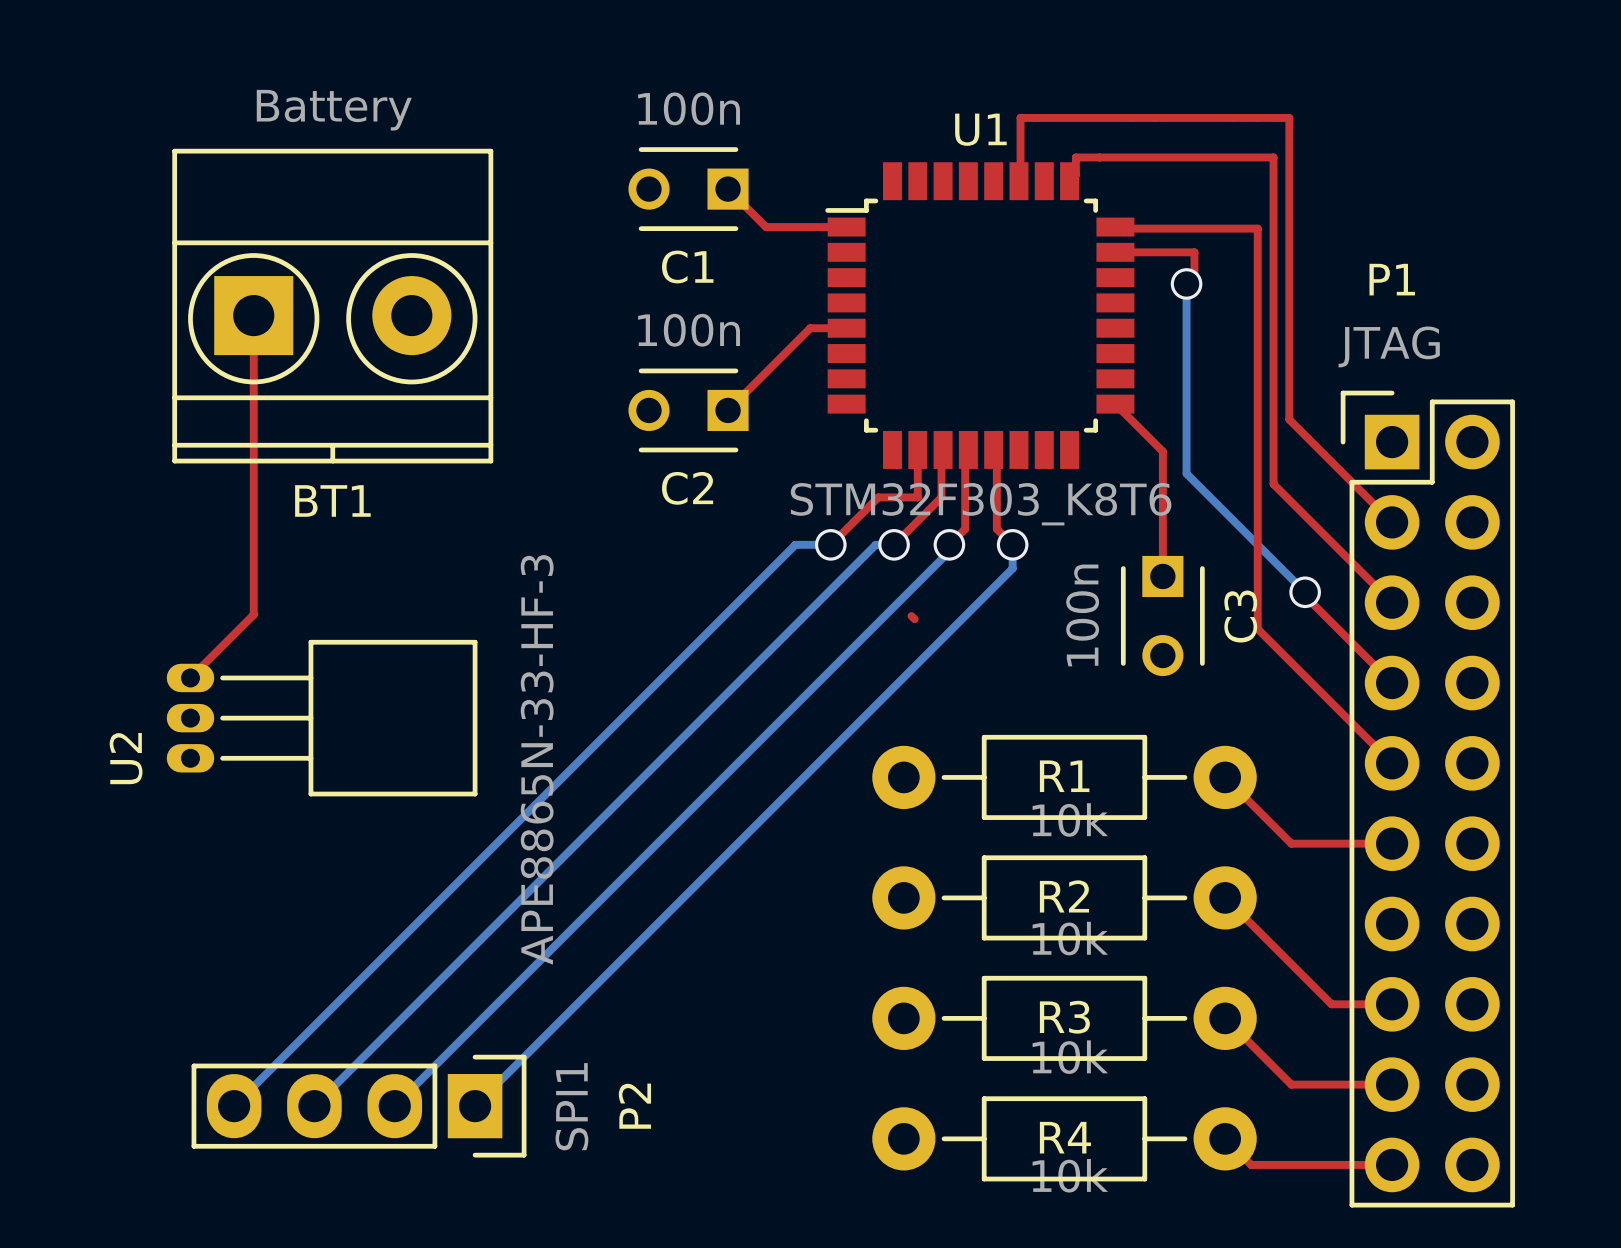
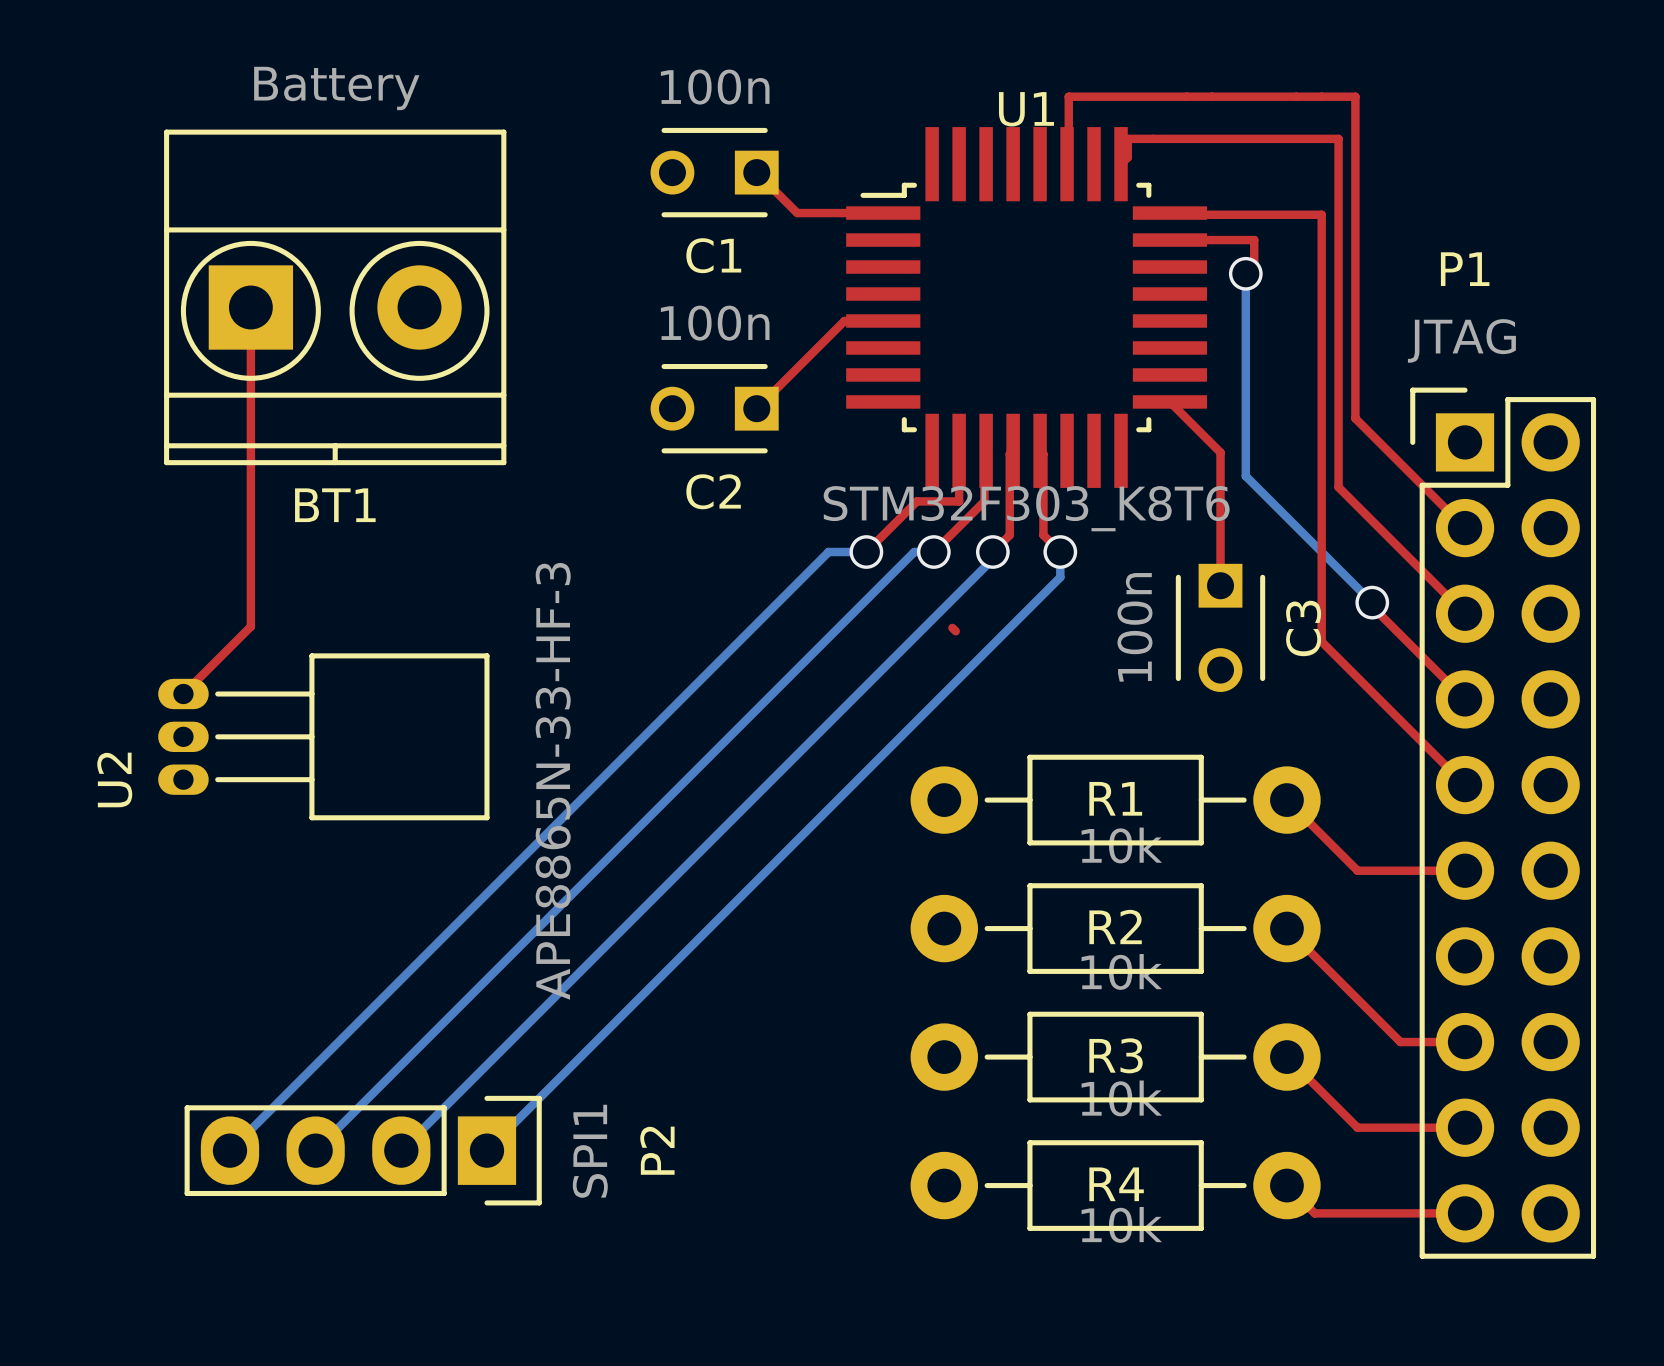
U1 footprint: [825, 162, 1135, 469] -> [846, 127, 1208, 488]

